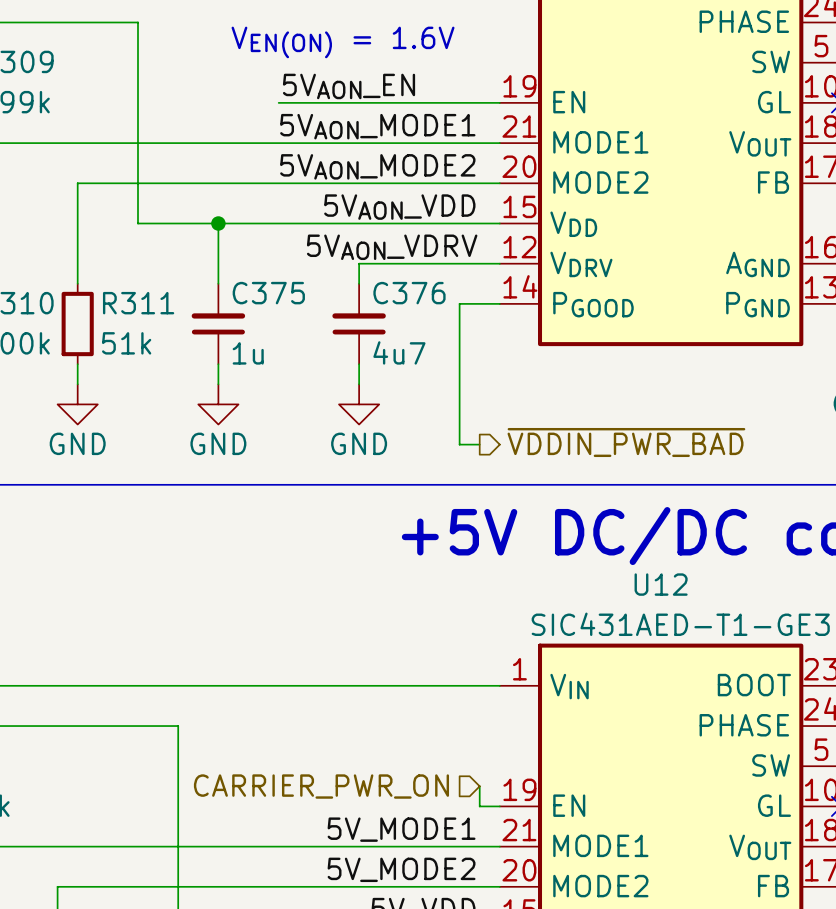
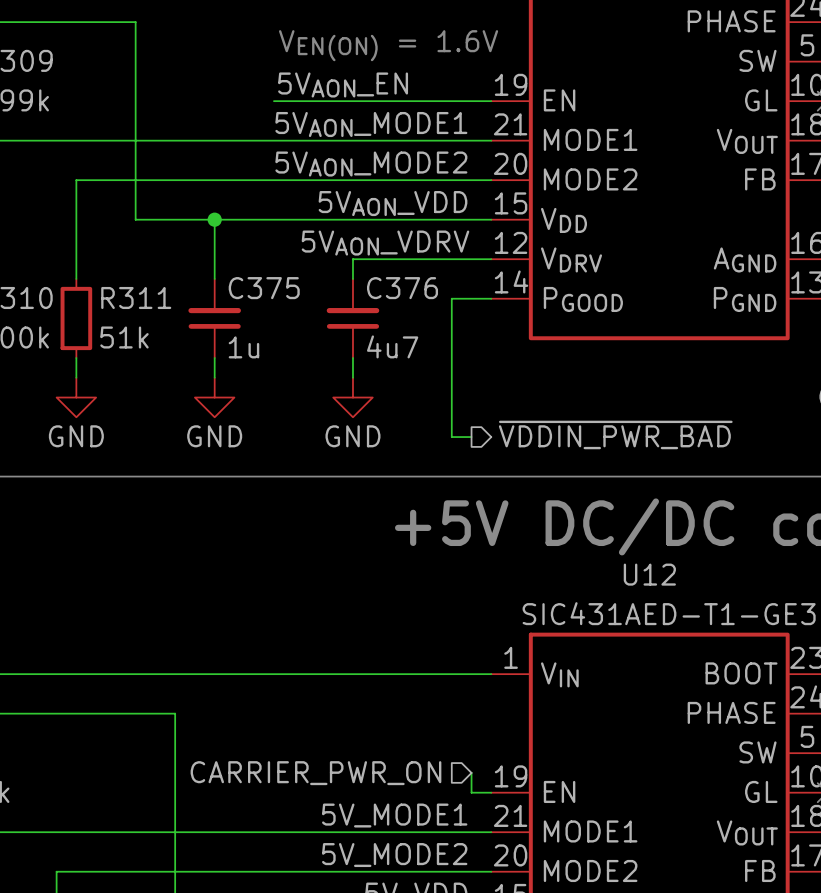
text position: VEN(ON) = 1.6V (343, 42) -> VEN(ON) = 1.6V (388, 45)

